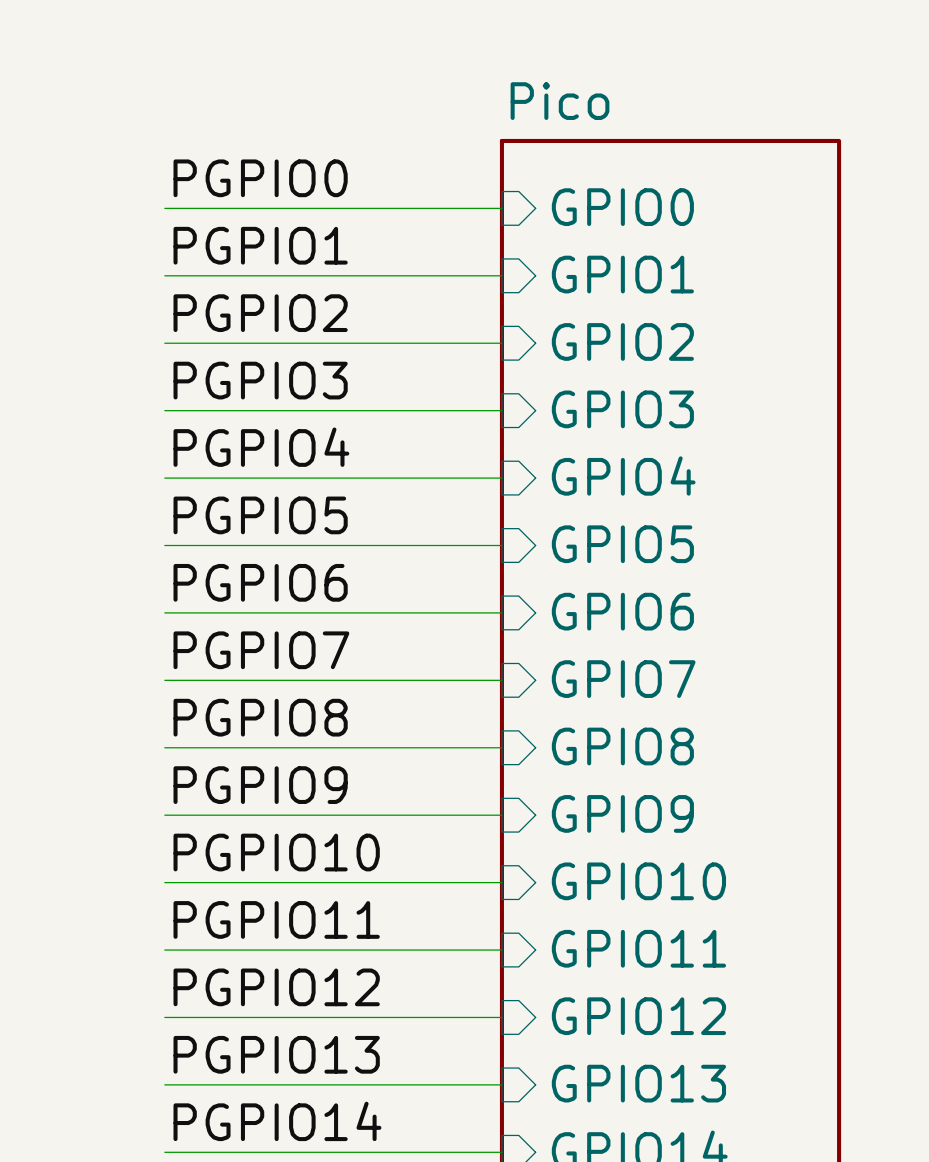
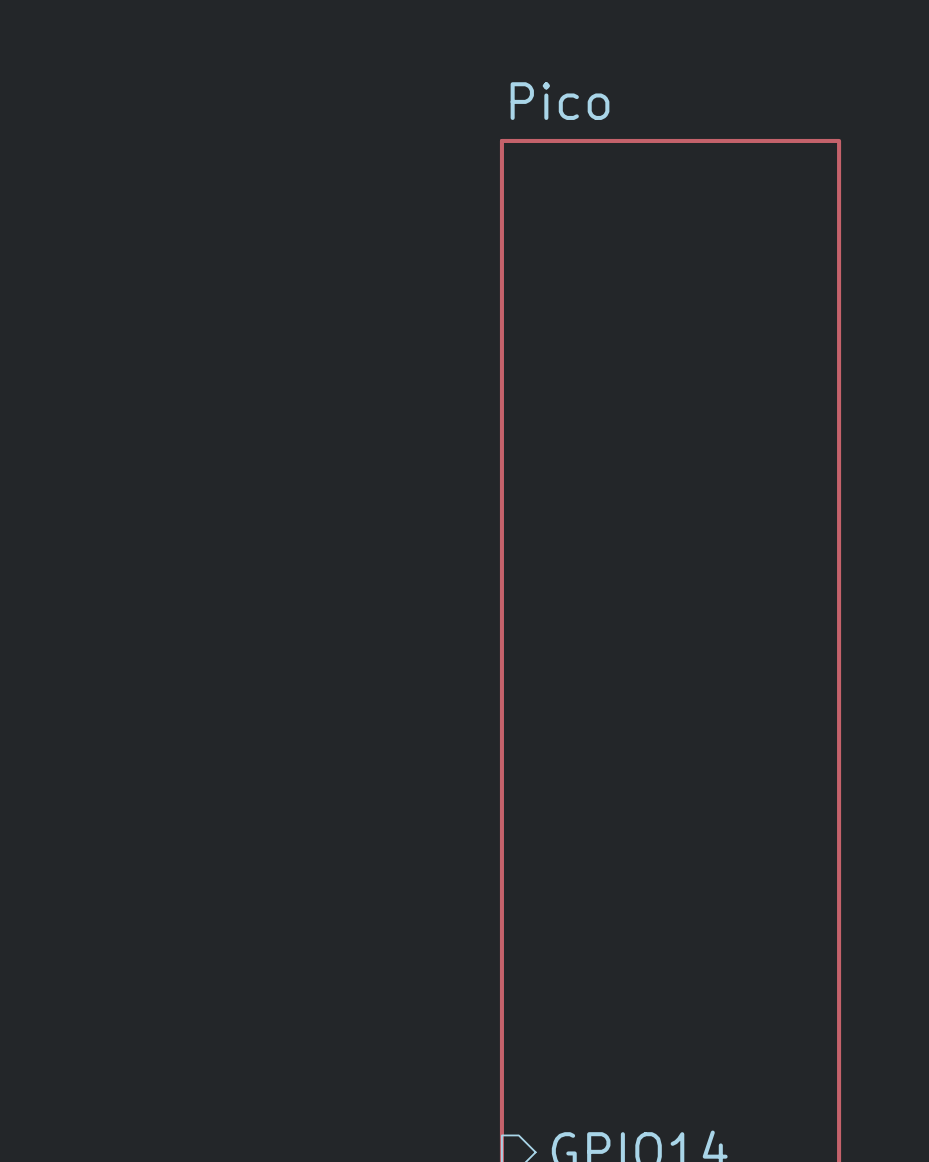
label: PGPIO0 (260, 178) -> none
sheet pin: GPIO0 (622, 207) -> none
wire: (164, 208) (501, 208) -> none
label: PGPIO1 (260, 245) -> none
sheet pin: GPIO1 (622, 274) -> none
wire: (164, 275) (501, 275) -> none
label: PGPIO2 (260, 313) -> none
sheet pin: GPIO2 (622, 341) -> none
wire: (164, 343) (501, 343) -> none
label: PGPIO3 (260, 380) -> none
sheet pin: GPIO3 (622, 409) -> none
wire: (164, 410) (501, 410) -> none
label: PGPIO4 (261, 447) -> none
sheet pin: GPIO4 (623, 476) -> none
wire: (164, 478) (501, 478) -> none
label: PGPIO5 (260, 515) -> none
sheet pin: GPIO5 (622, 544) -> none
wire: (164, 545) (501, 545) -> none
label: PGPIO6 (260, 582) -> none
sheet pin: GPIO6 (622, 611) -> none
wire: (164, 612) (501, 612) -> none
label: PGPIO7 (261, 650) -> none
sheet pin: GPIO7 (623, 679) -> none
wire: (164, 680) (501, 680) -> none
label: PGPIO8 (260, 717) -> none
sheet pin: GPIO8 (622, 746) -> none
wire: (164, 747) (501, 747) -> none
label: PGPIO9 (260, 785) -> none
sheet pin: GPIO9 (622, 813) -> none
wire: (164, 815) (501, 815) -> none
label: PGPIO10 (276, 852) -> none
sheet pin: GPIO10 (638, 881) -> none
wire: (164, 882) (501, 882) -> none
label: PGPIO11 (276, 919) -> none
sheet pin: GPIO11 (638, 948) -> none
wire: (164, 950) (501, 950) -> none
label: PGPIO12 (276, 987) -> none
sheet pin: GPIO12 (638, 1016) -> none
wire: (164, 1017) (501, 1017) -> none
label: PGPIO13 (276, 1054) -> none
sheet pin: GPIO13 (638, 1083) -> none
wire: (164, 1084) (501, 1084) -> none
label: PGPIO14 (277, 1121) -> none
wire: (164, 1152) (501, 1152) -> none

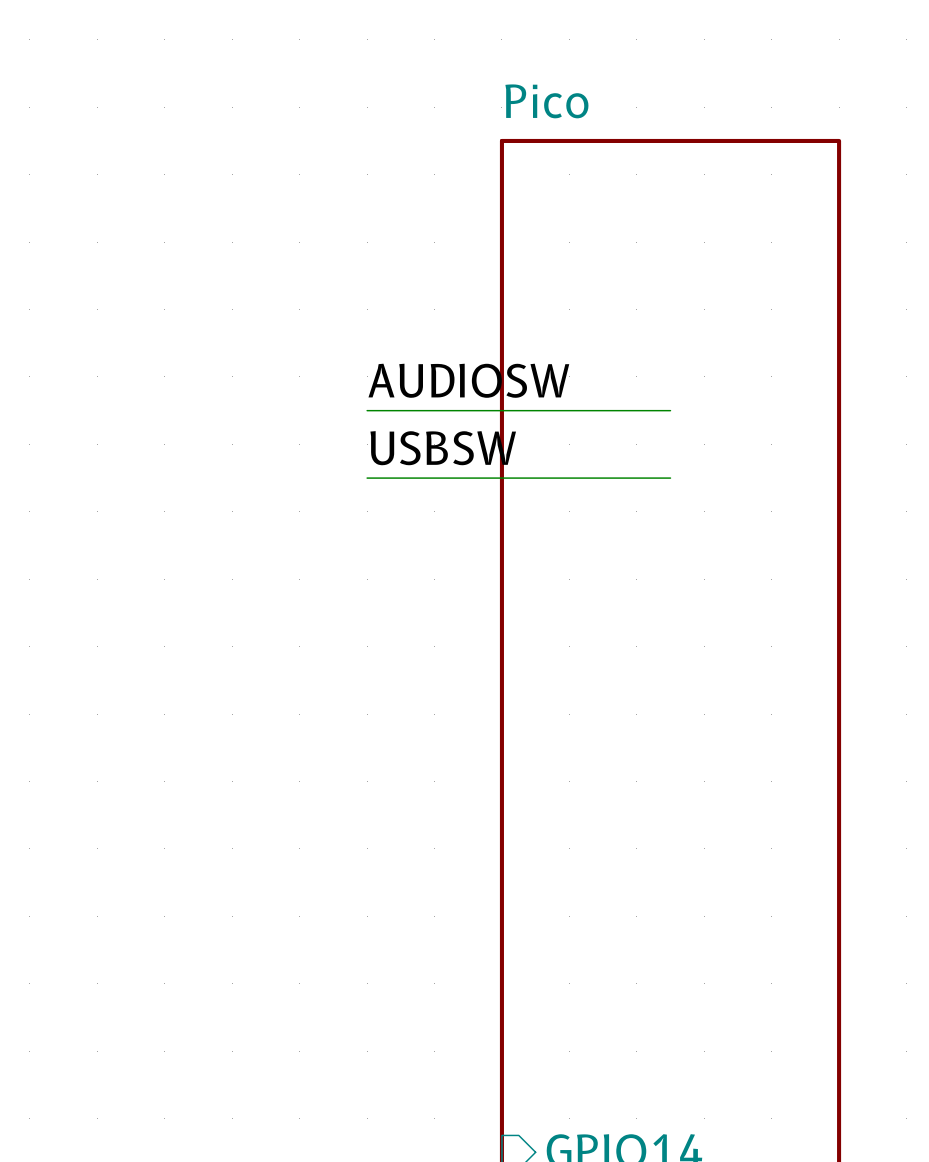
label: none -> AUDIOSW (468, 380)
wire: none -> (367, 410) (670, 410)
label: none -> USBSW (443, 448)
wire: none -> (367, 478) (670, 478)

